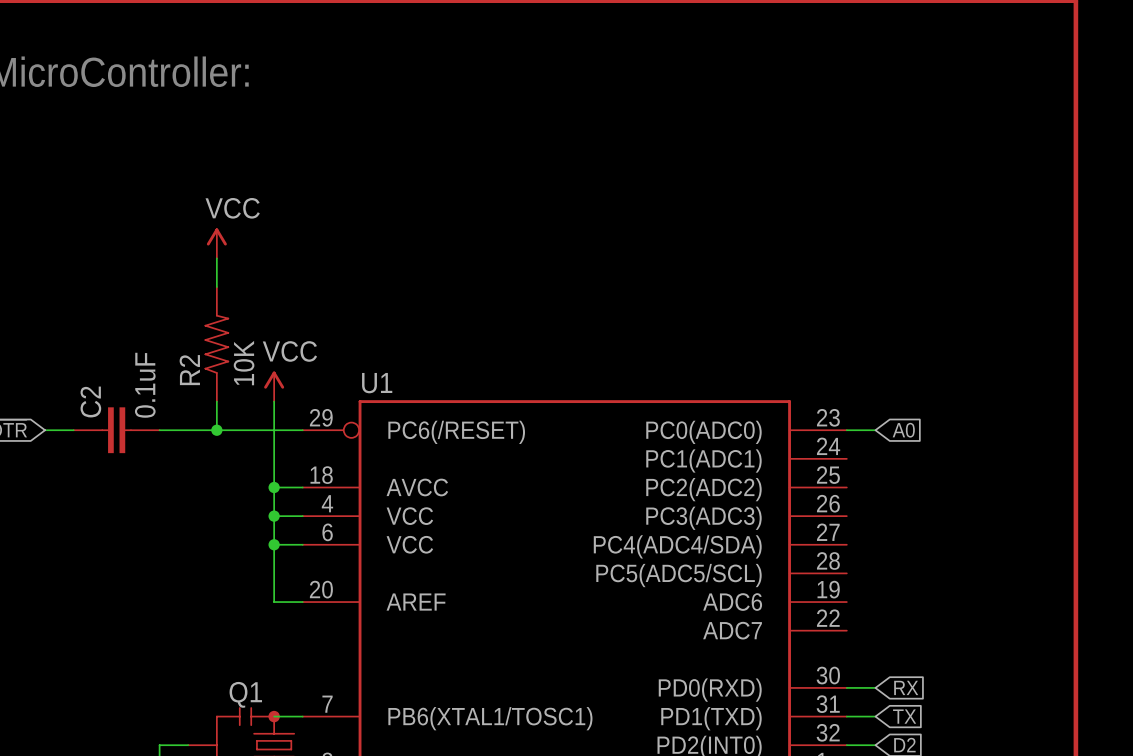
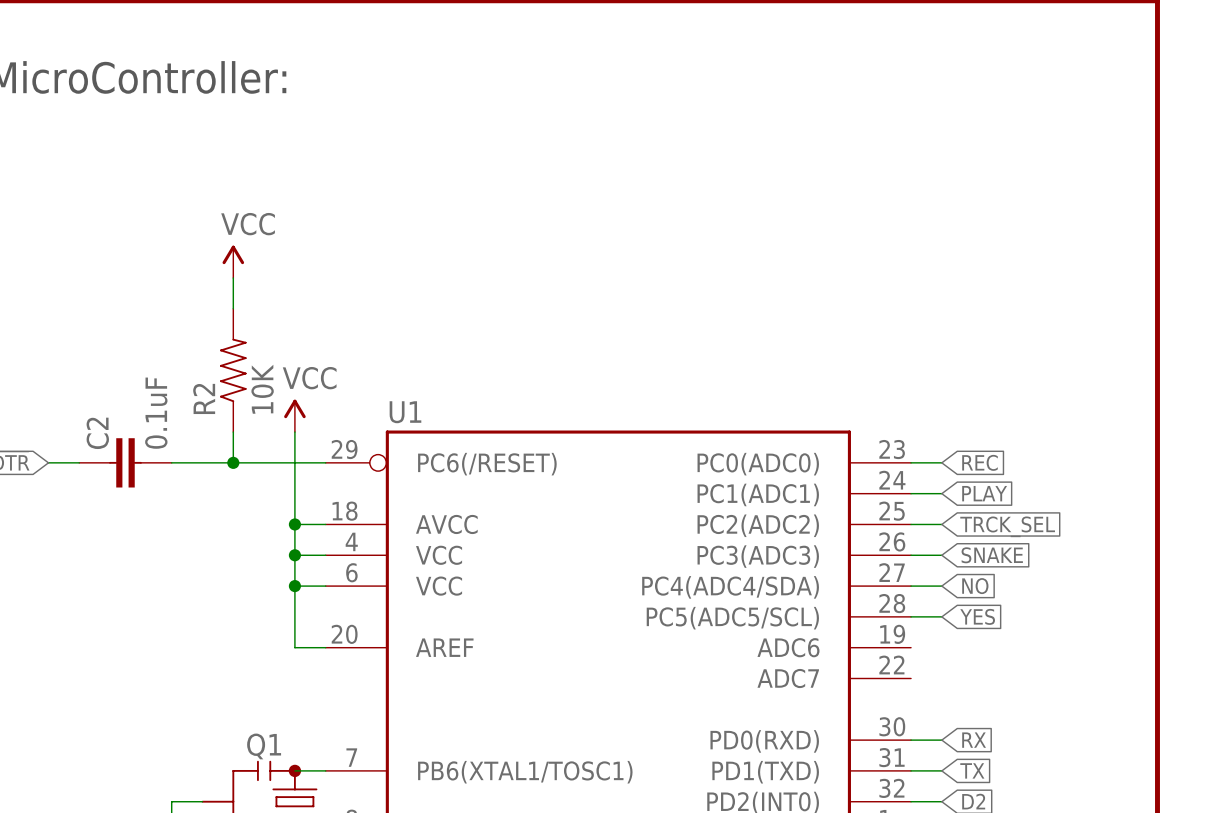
global label: A0 (903, 430) -> REC (980, 462)
wire: none -> (911, 493) (941, 493)
global label: none -> PLAY (984, 493)
wire: none -> (911, 524) (941, 524)
global label: none -> TRCK_SEL (1007, 526)
wire: none -> (911, 555) (941, 555)
global label: none -> SNAKE (992, 555)
wire: none -> (911, 586) (941, 586)
global label: none -> NO (975, 586)
wire: none -> (911, 616) (941, 616)
global label: none -> YES (977, 616)

